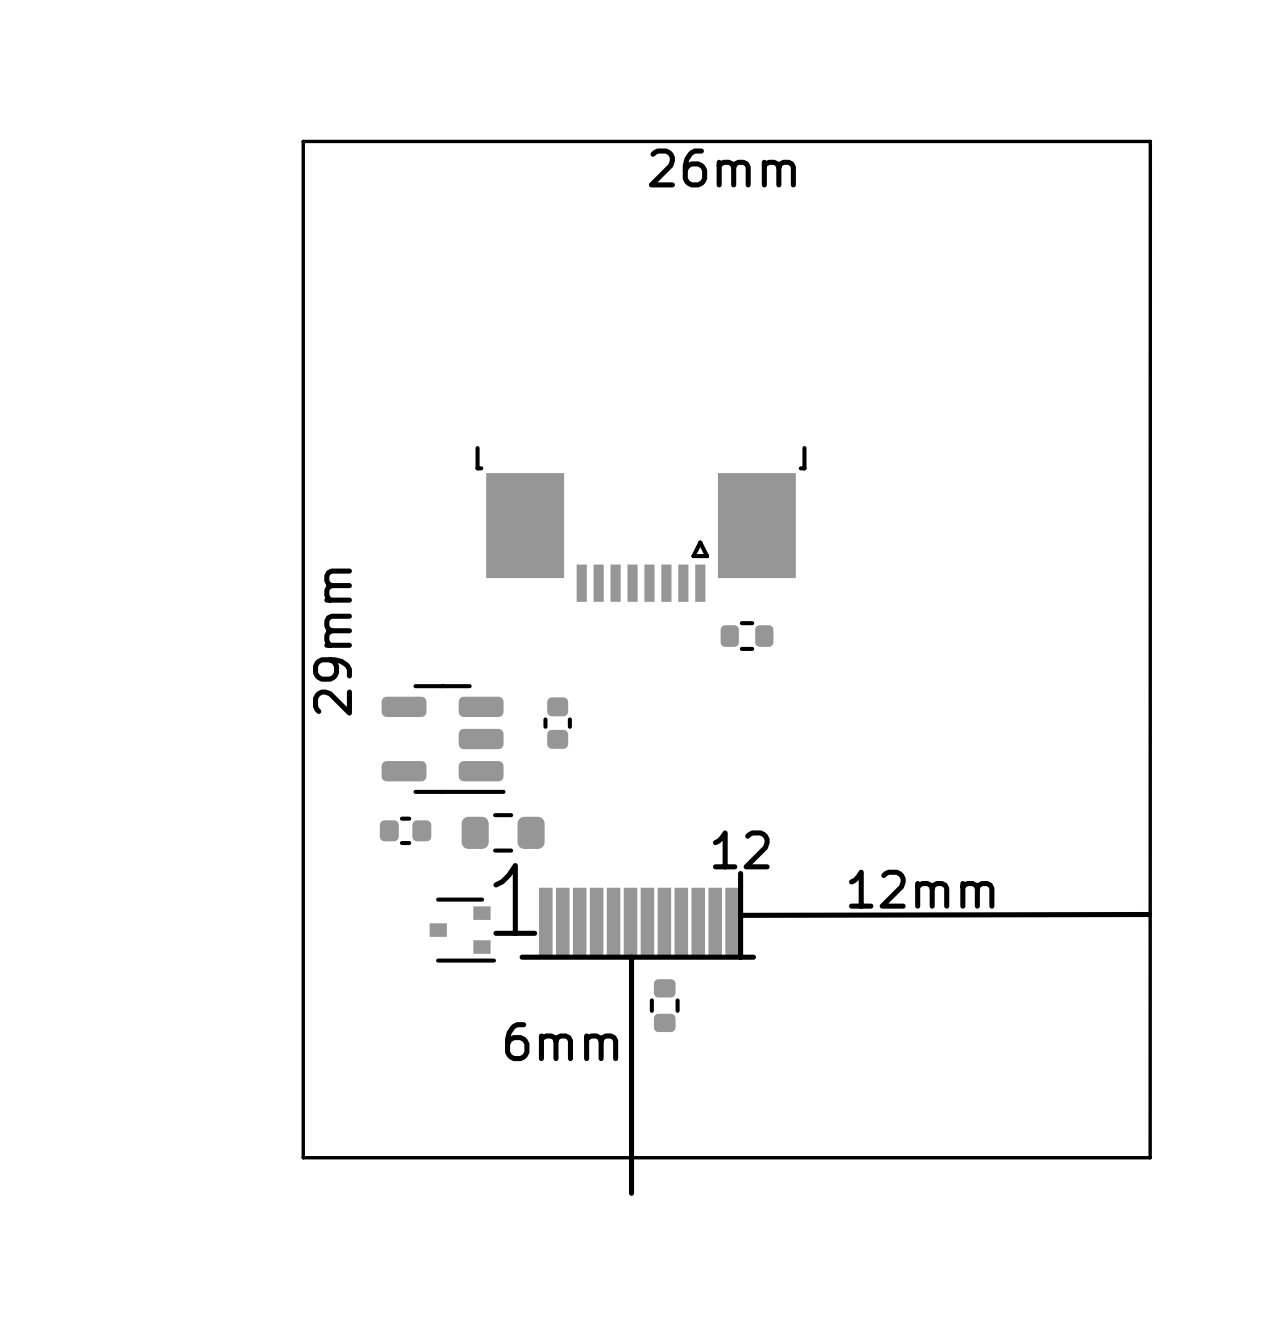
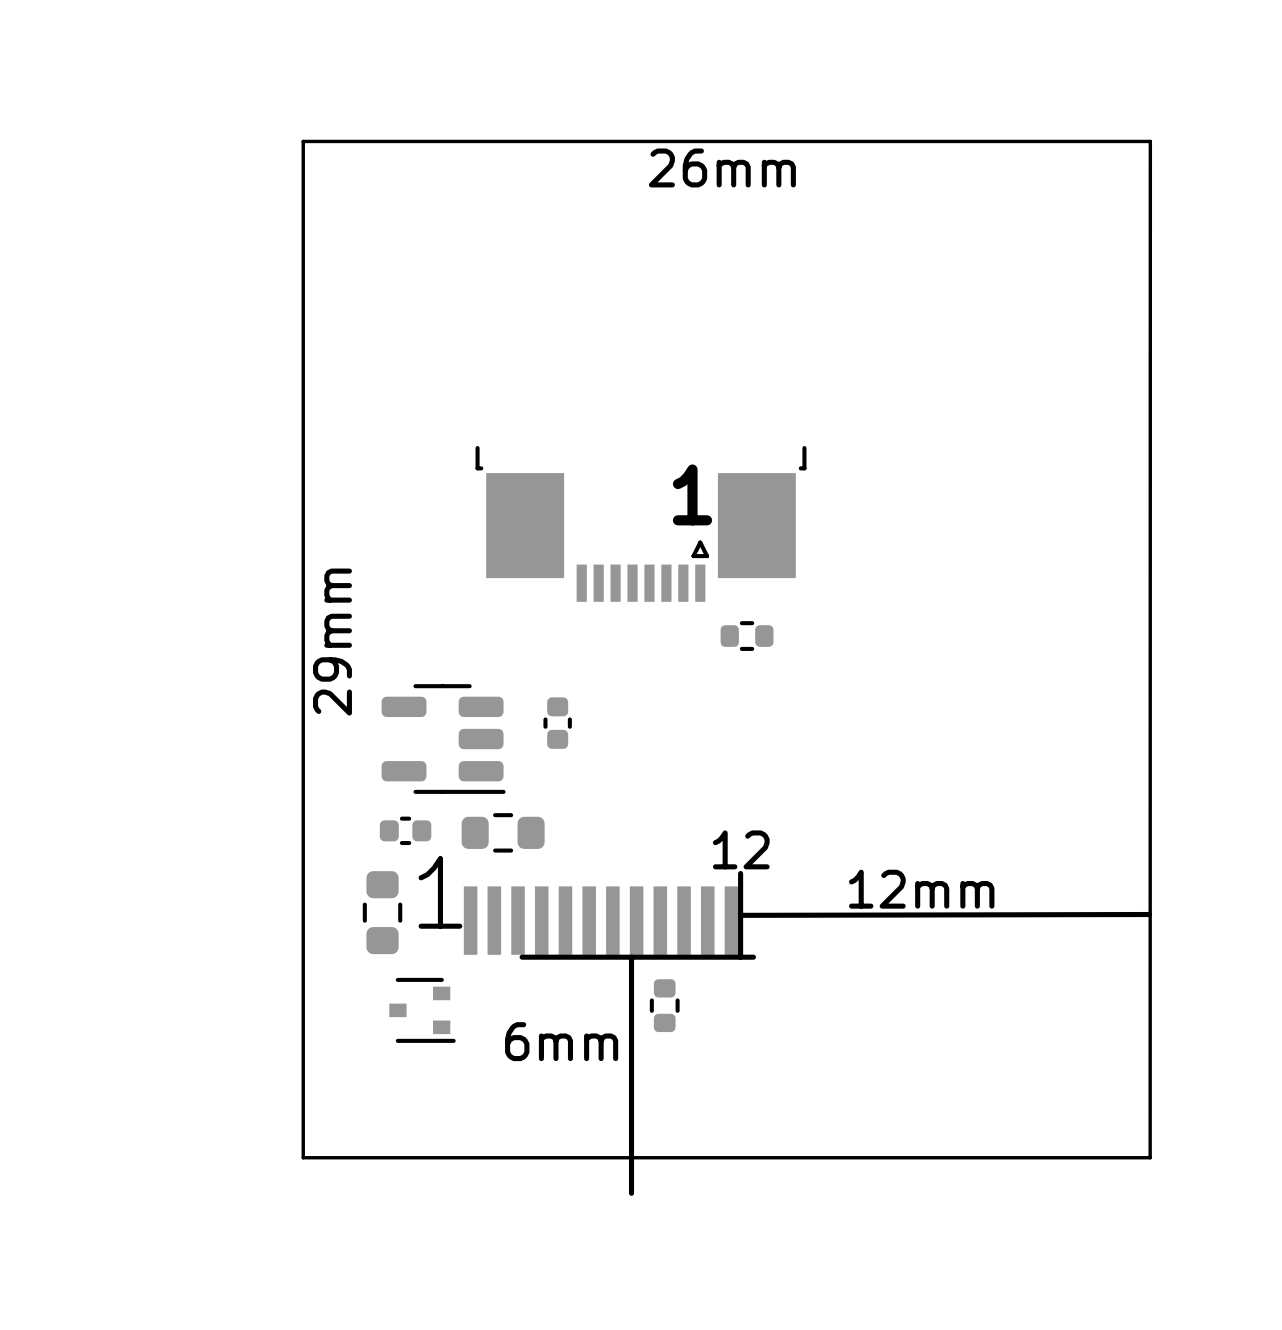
text: none -> 1 (692, 494)
text position: 1 (515, 899) -> 1 (440, 892)
part: none -> (382, 912)
part: none -> (601, 920)
part: (638, 921) -> none
part position: (462, 930) -> (422, 1010)

